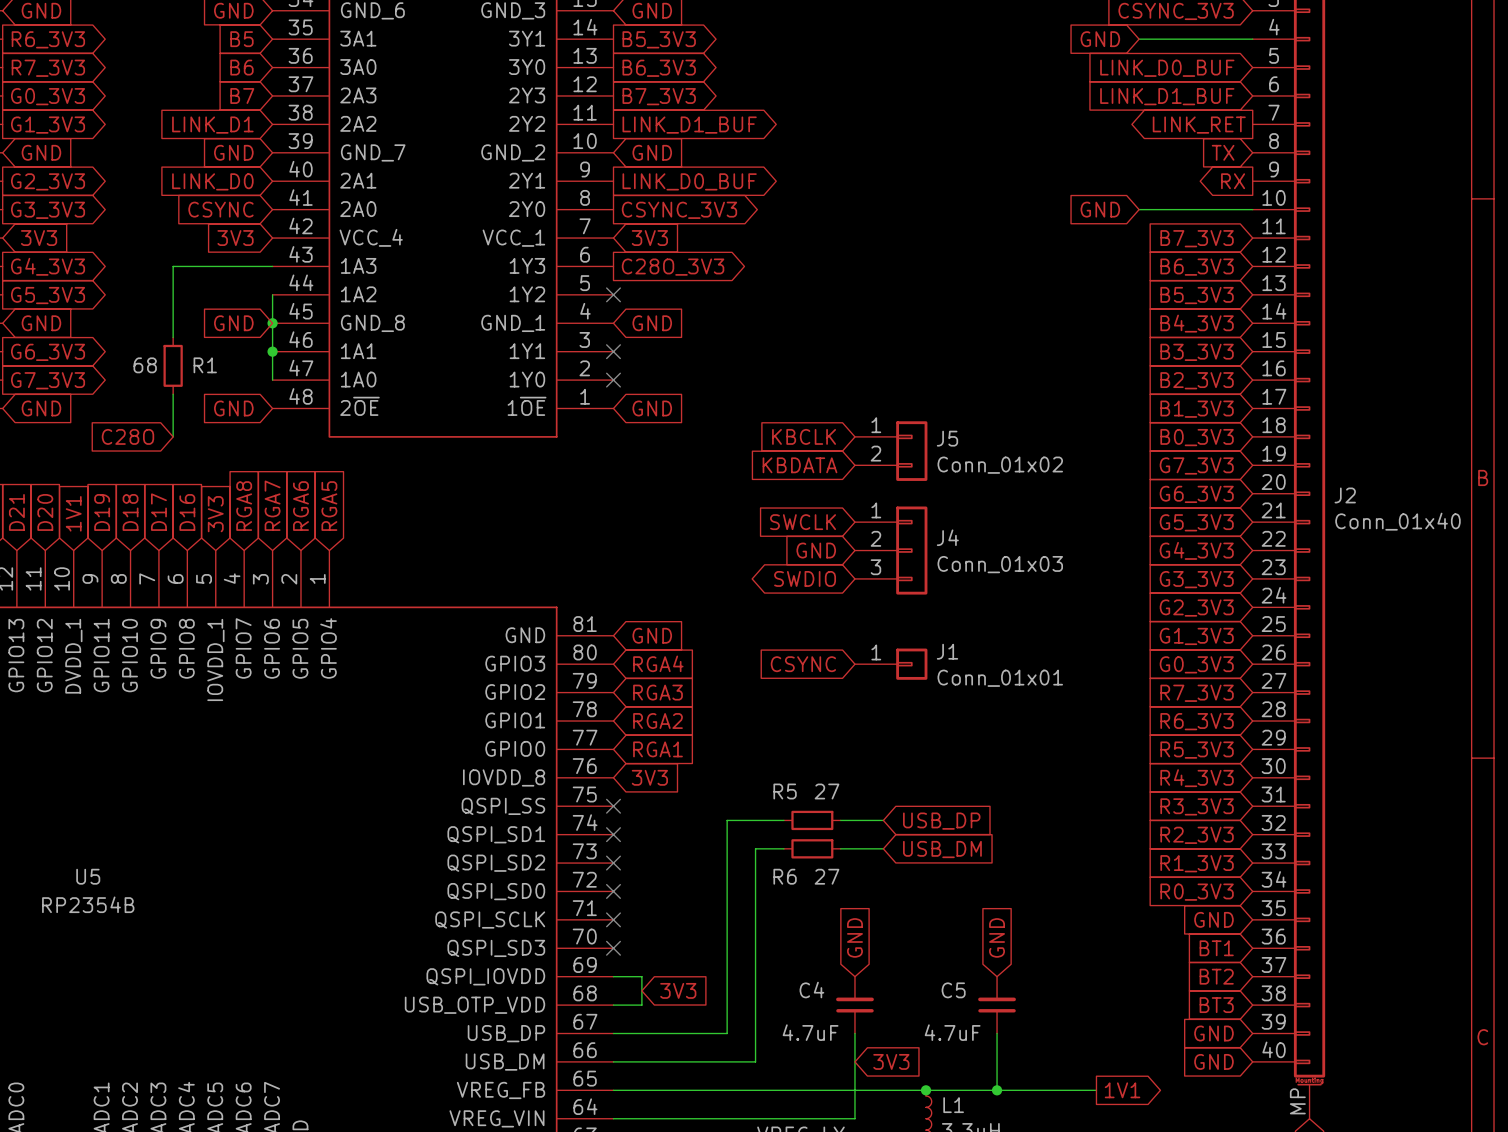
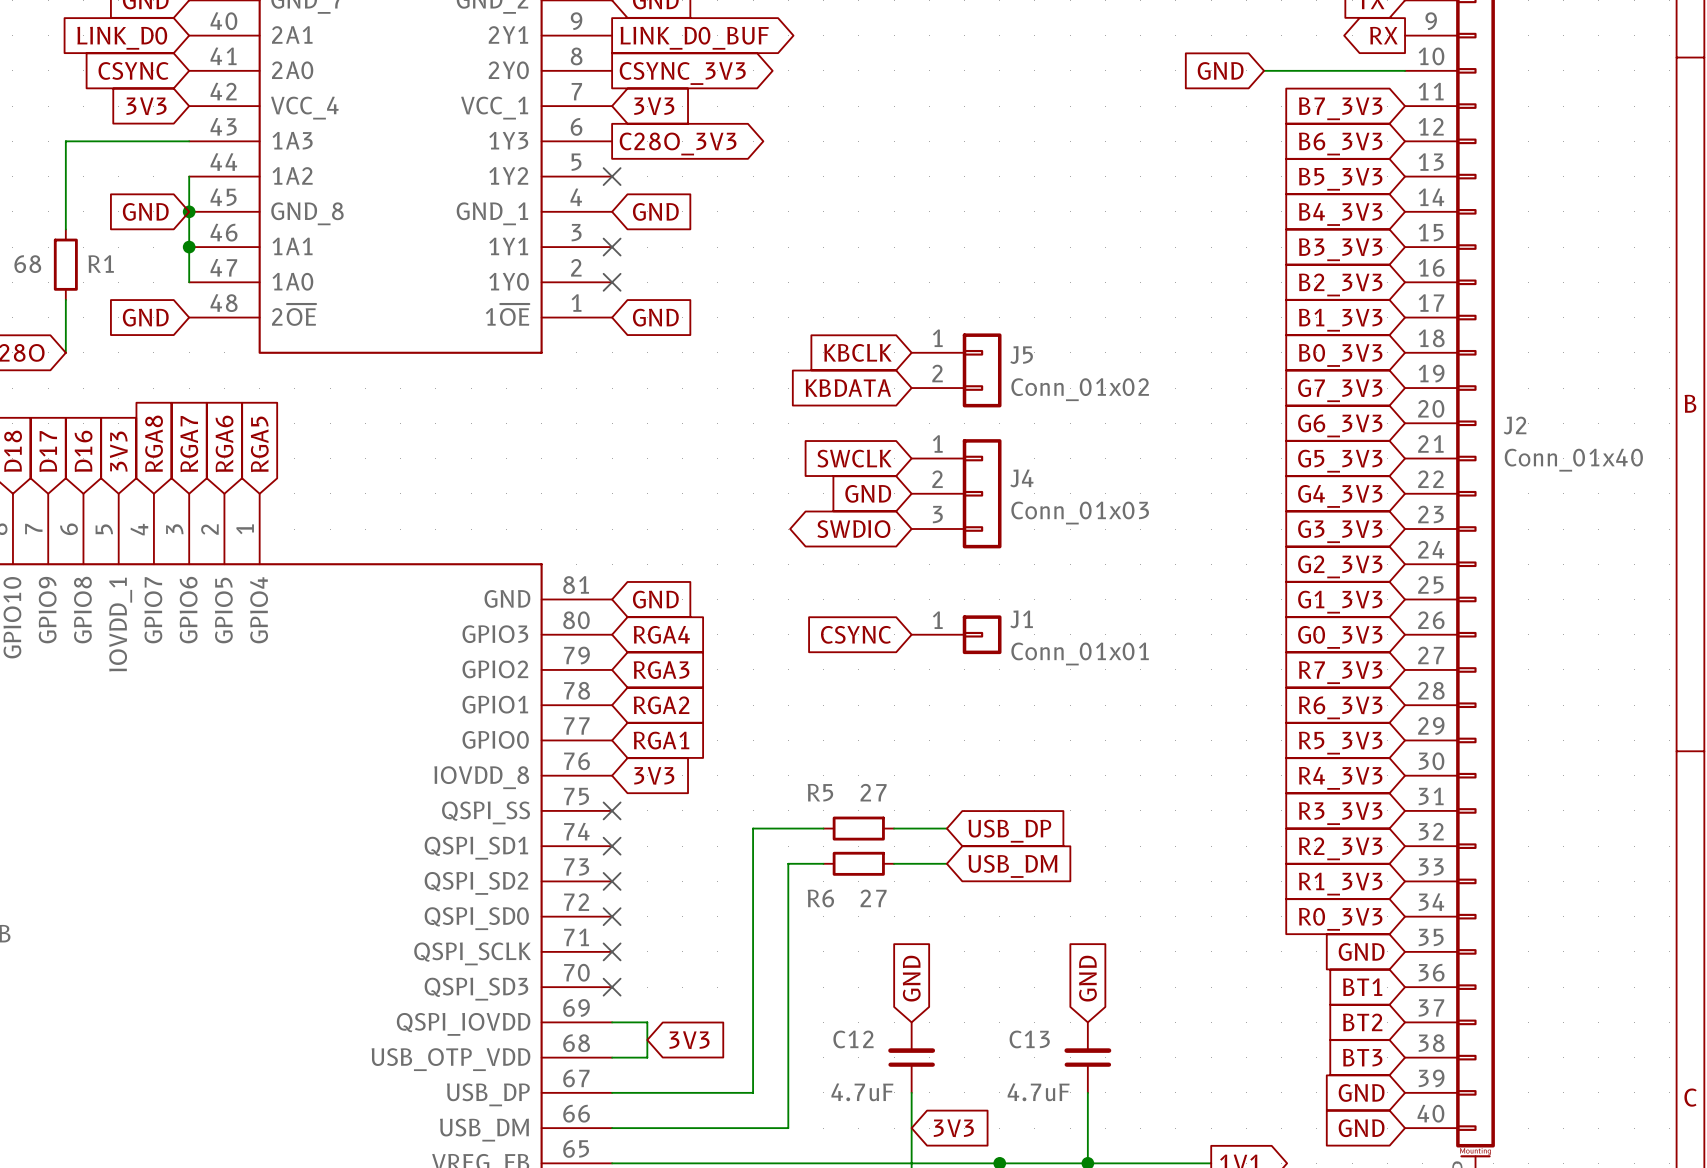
C4 name: C4 (811, 990) -> C12 (853, 1039)
C5 name: C5 (953, 990) -> C13 (1029, 1039)

